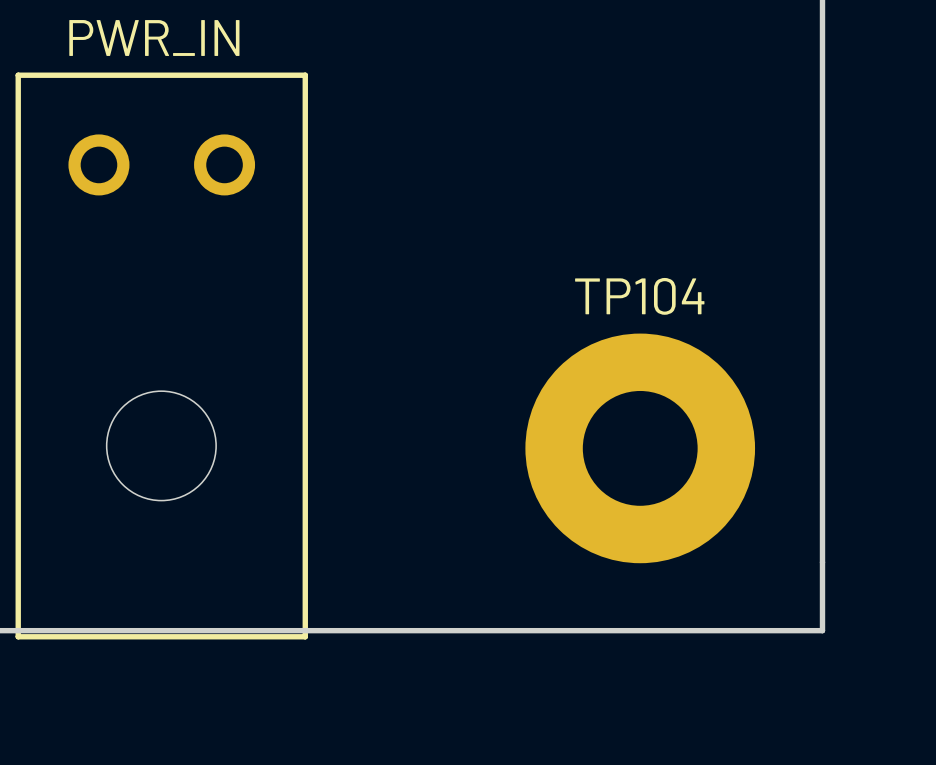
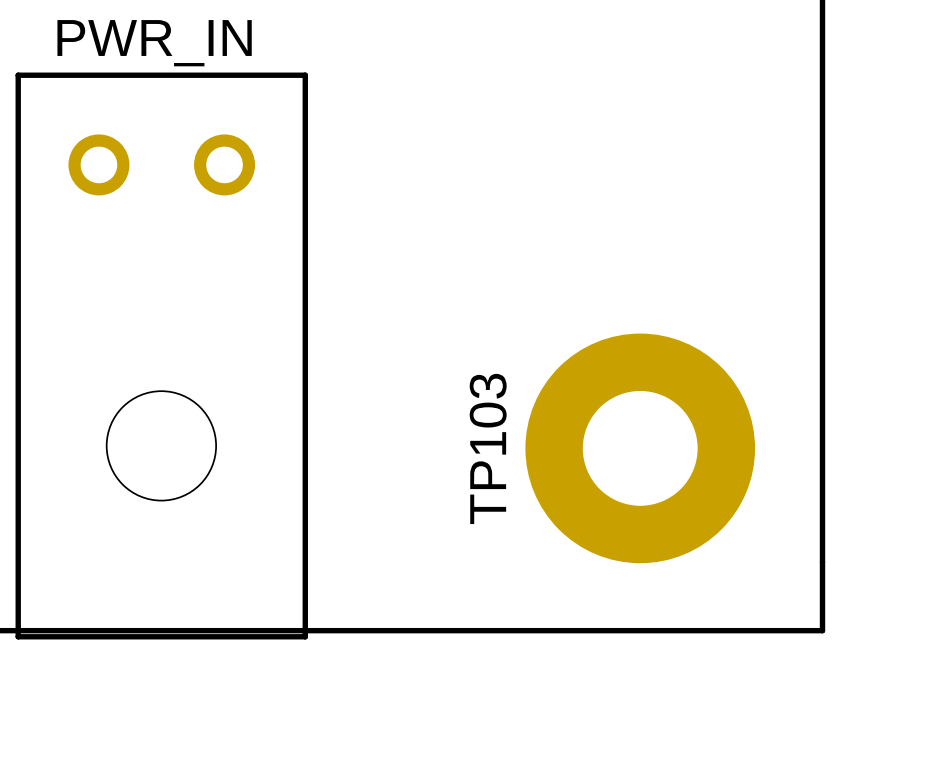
TP104 name: TP104 (639, 296) -> TP103 (488, 448)

